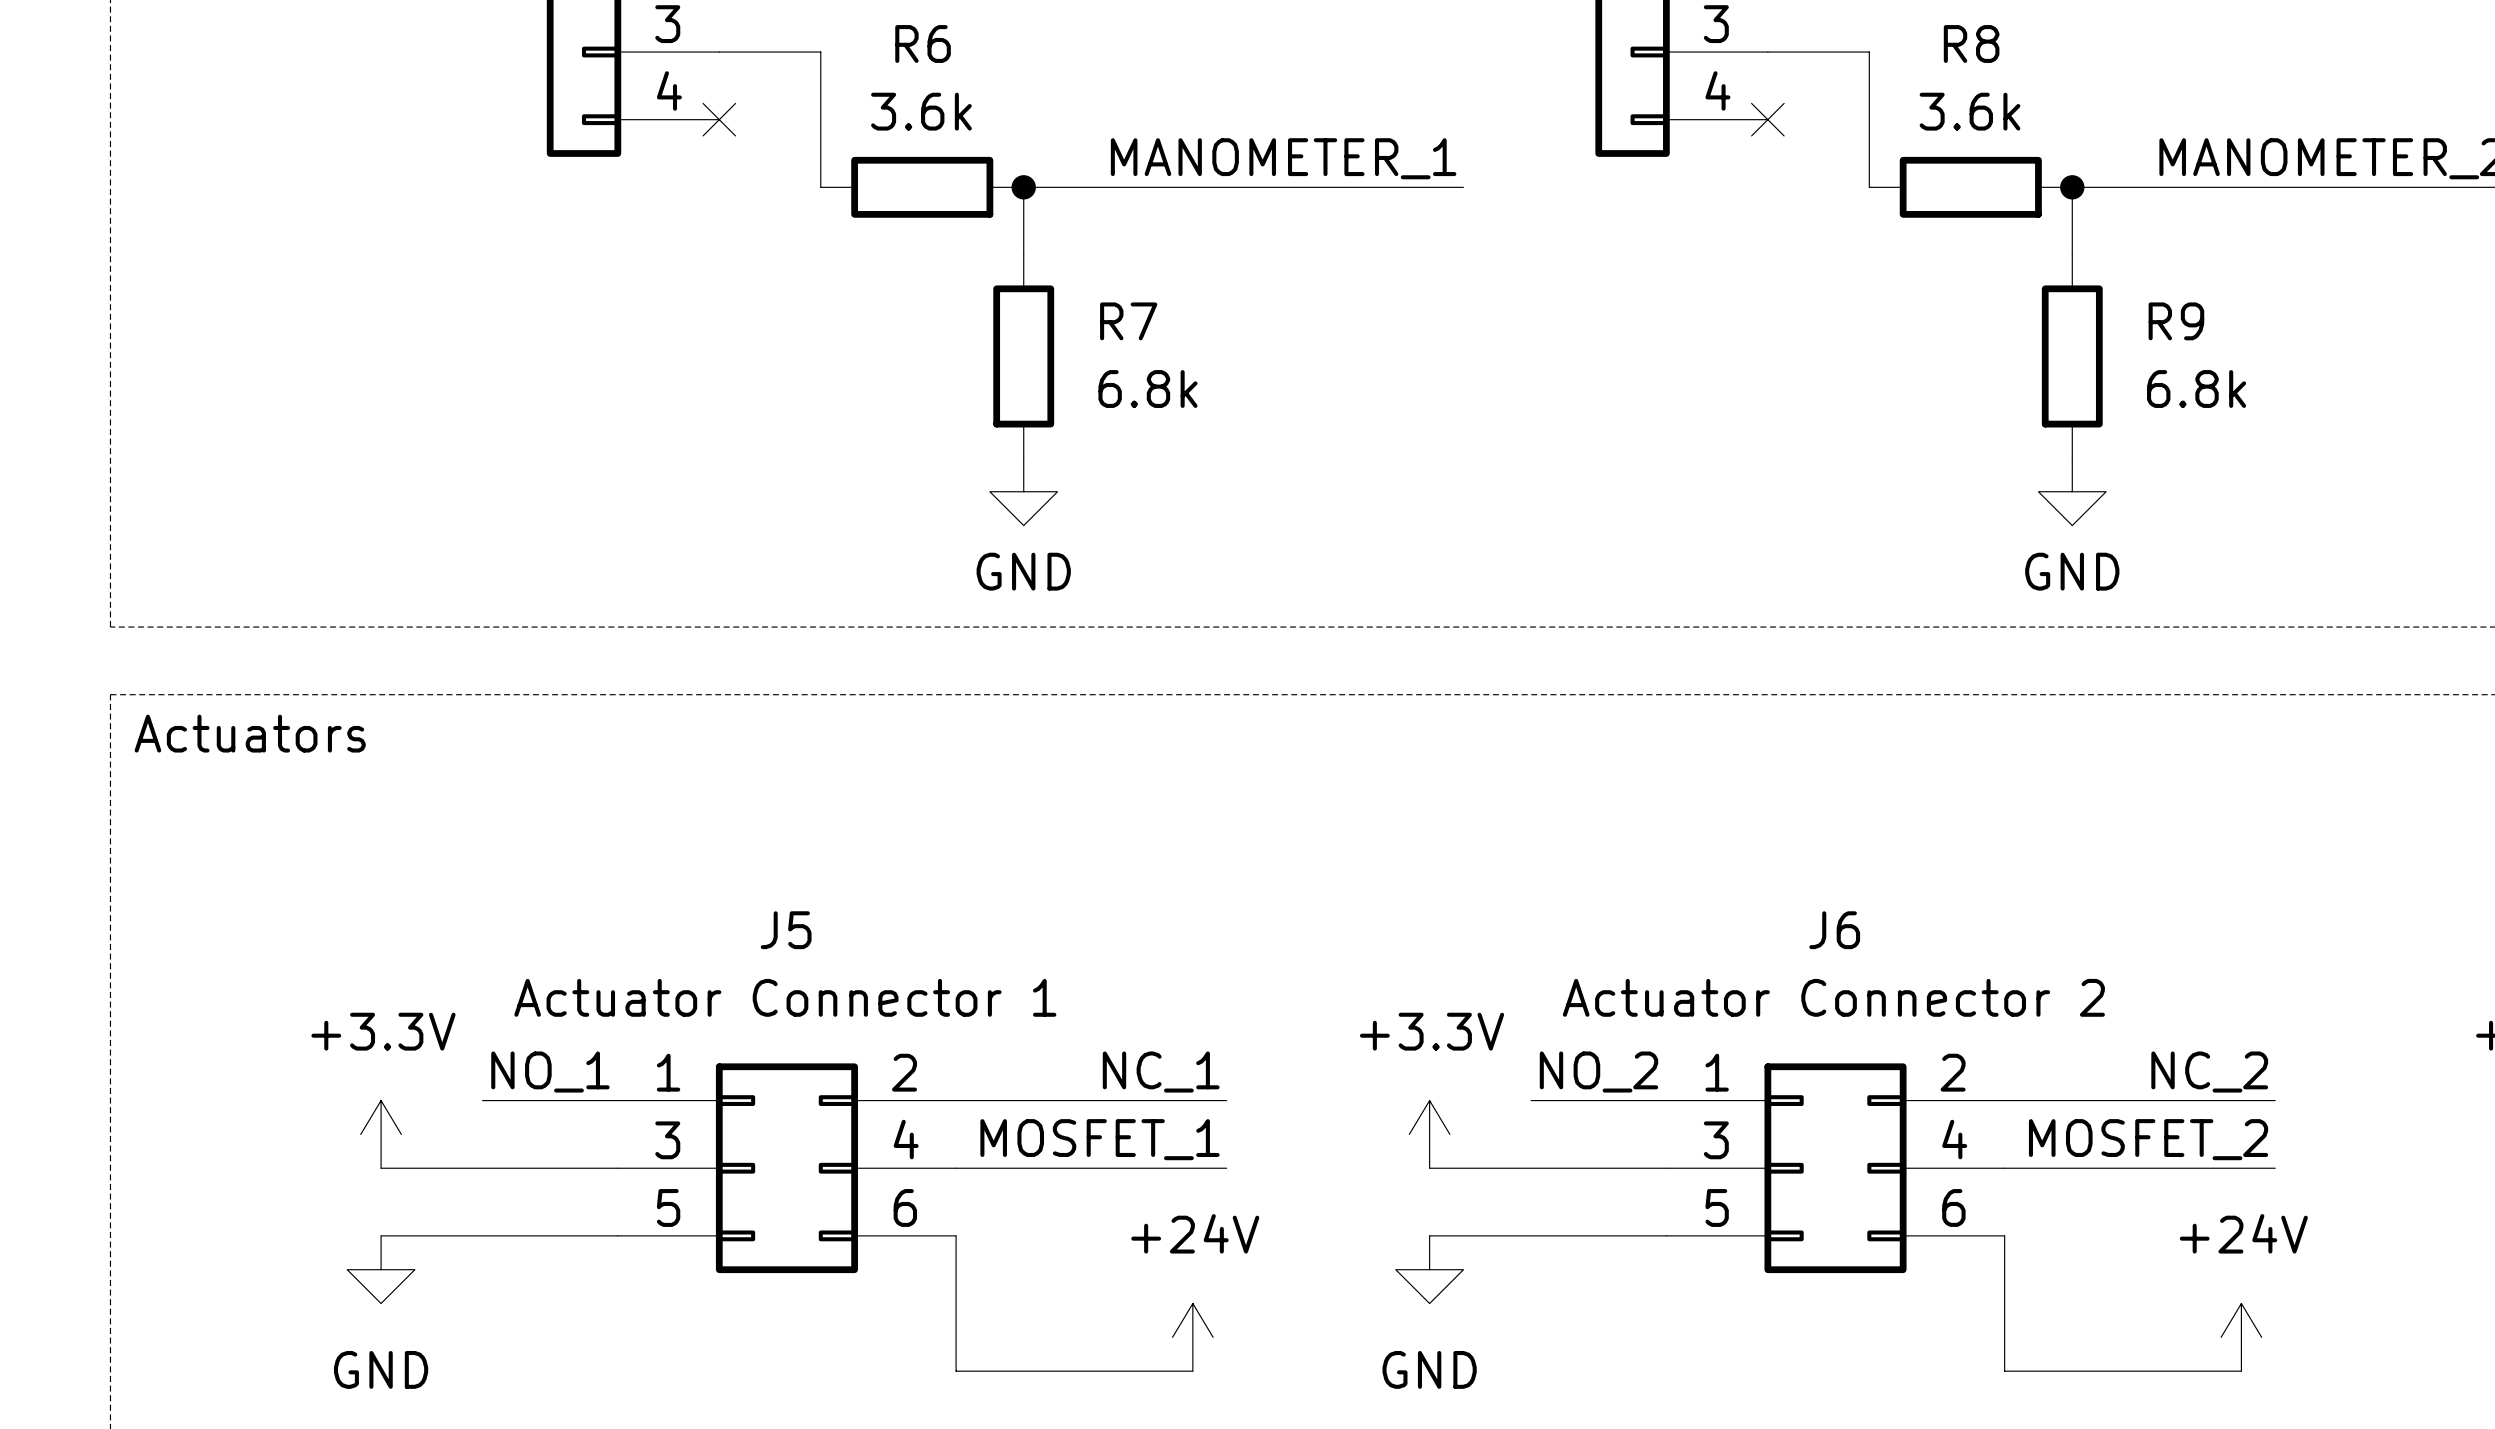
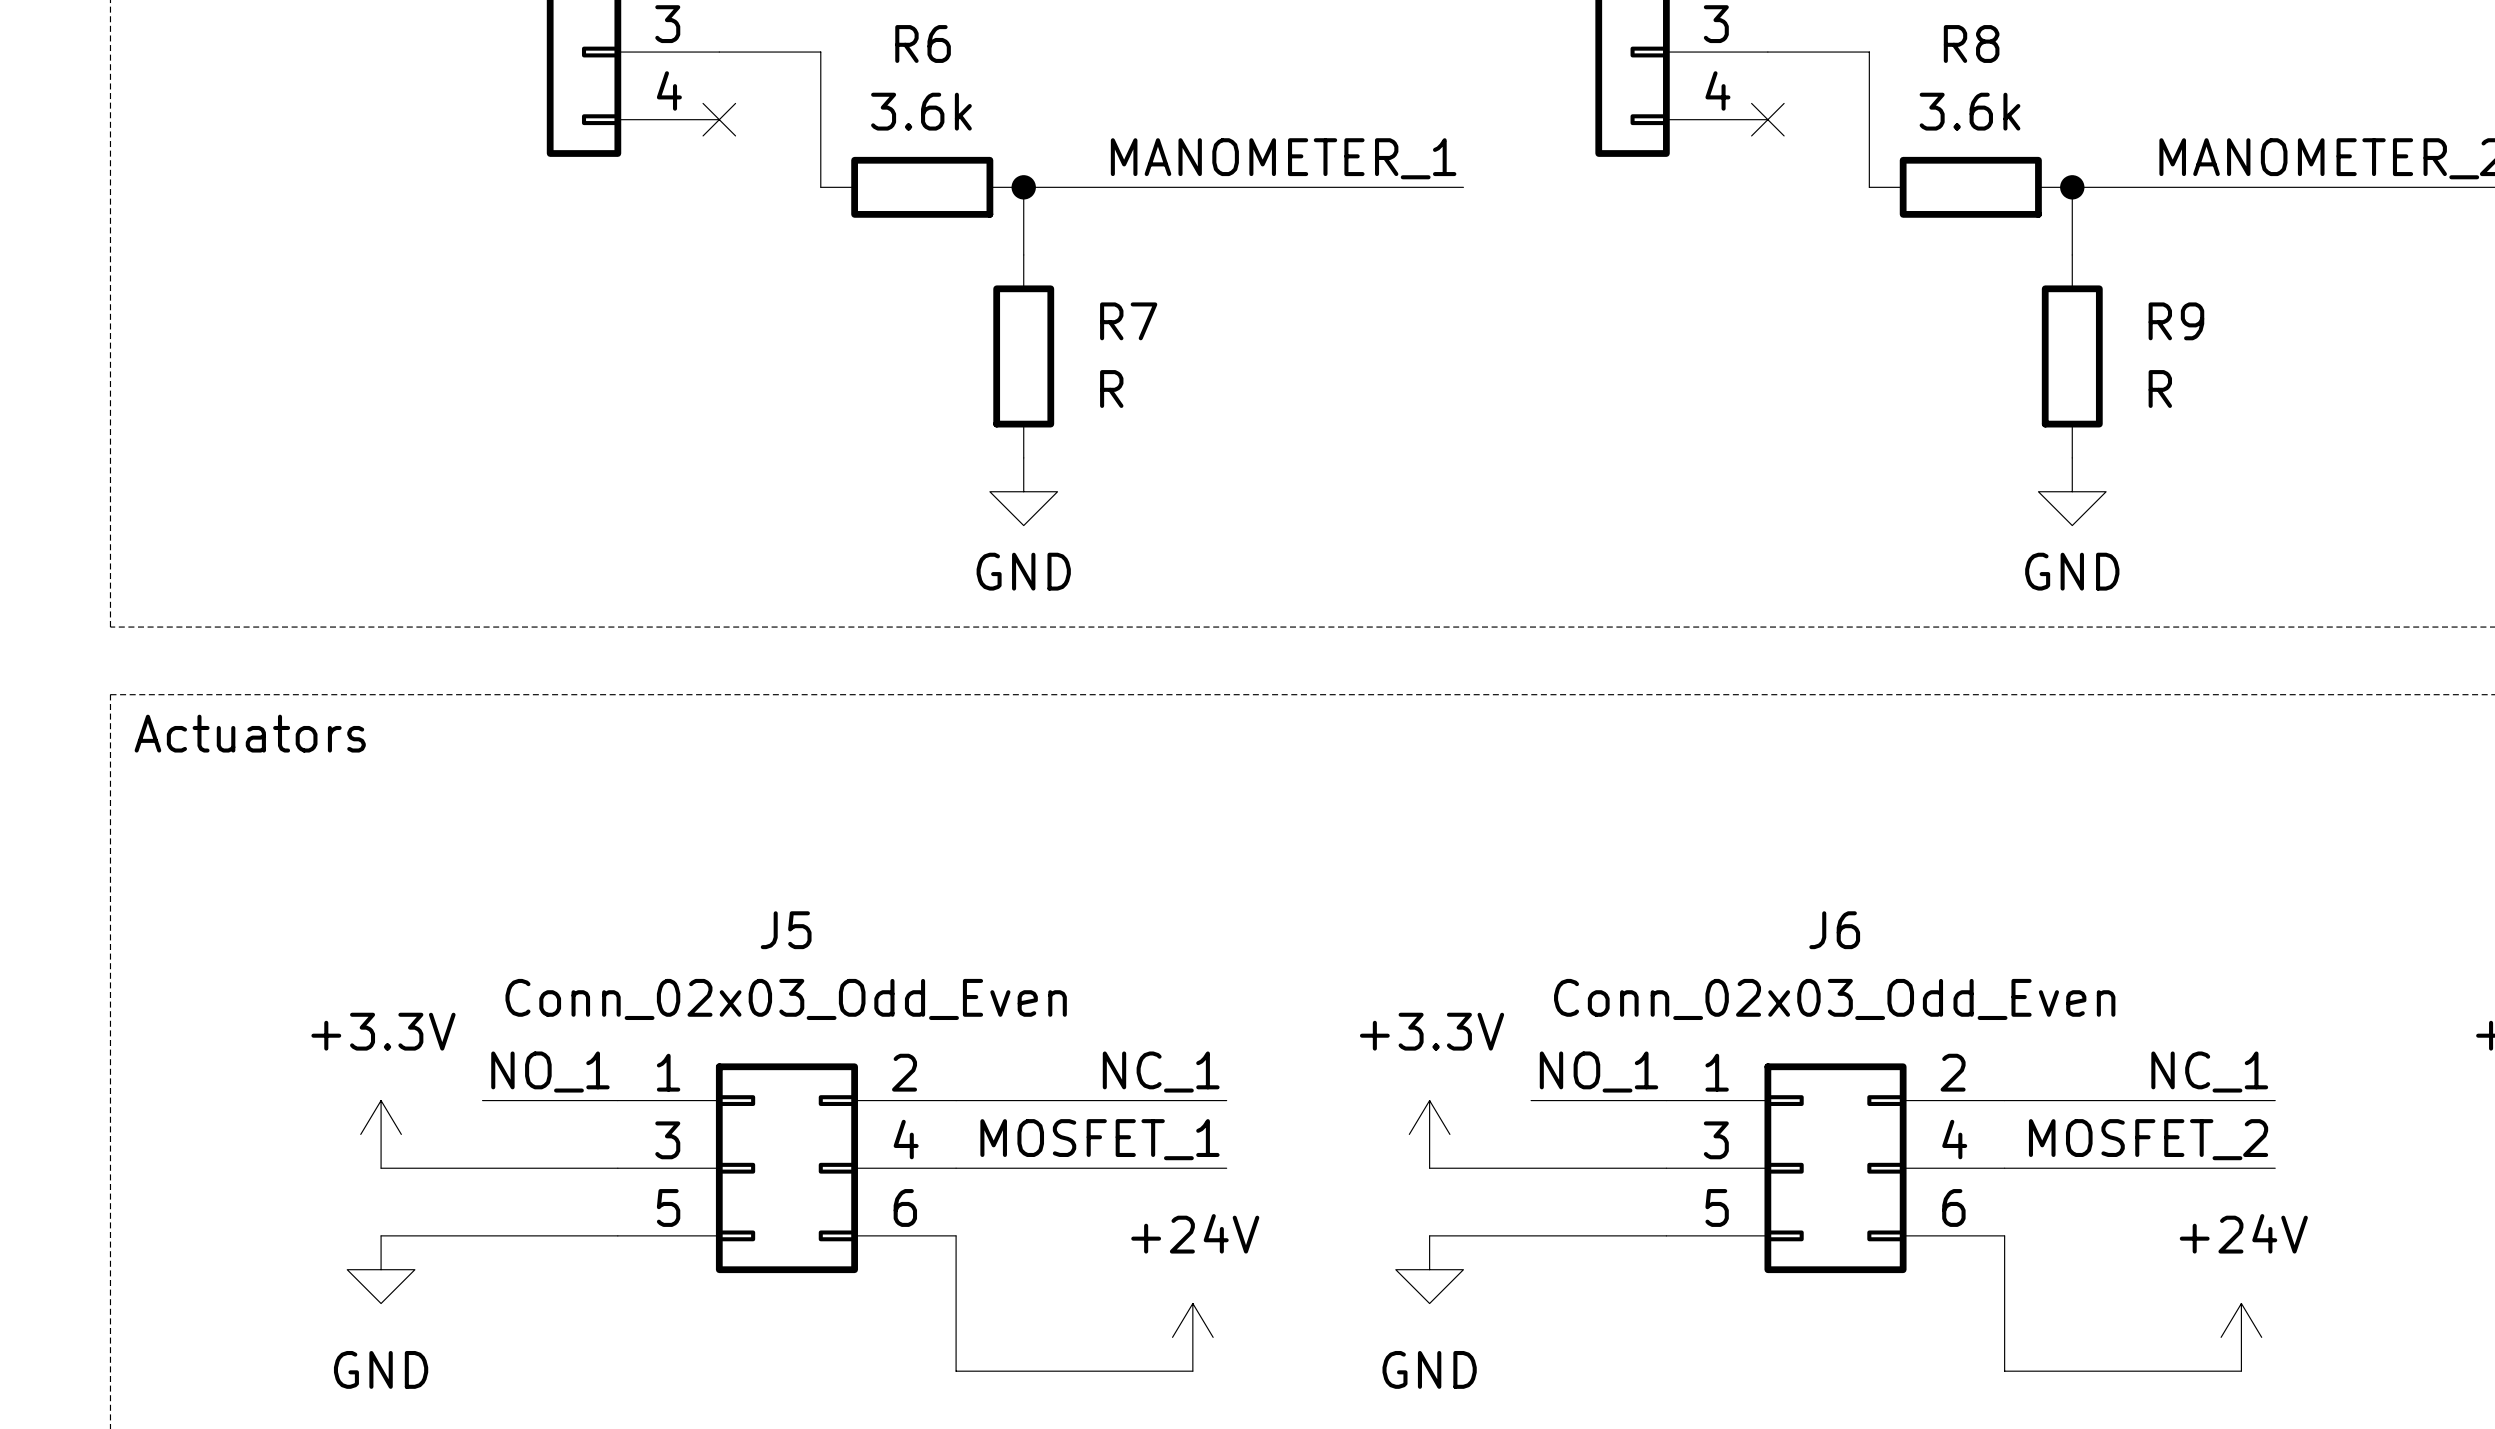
R7 value: 6.8k (1148, 389) -> R (1111, 389)
R9 value: 6.8k (2196, 389) -> R (2160, 389)
J5 value: Actuator Connector 1 (785, 997) -> Conn_02x03_Odd_Even (786, 999)
J6 value: Actuator Connector 2 (1833, 997) -> Conn_02x03_Odd_Even (1834, 999)
label: NO_2 (1598, 1072) -> NO_1 (1598, 1072)
label: NC_2 (2209, 1072) -> NC_1 (2209, 1072)

